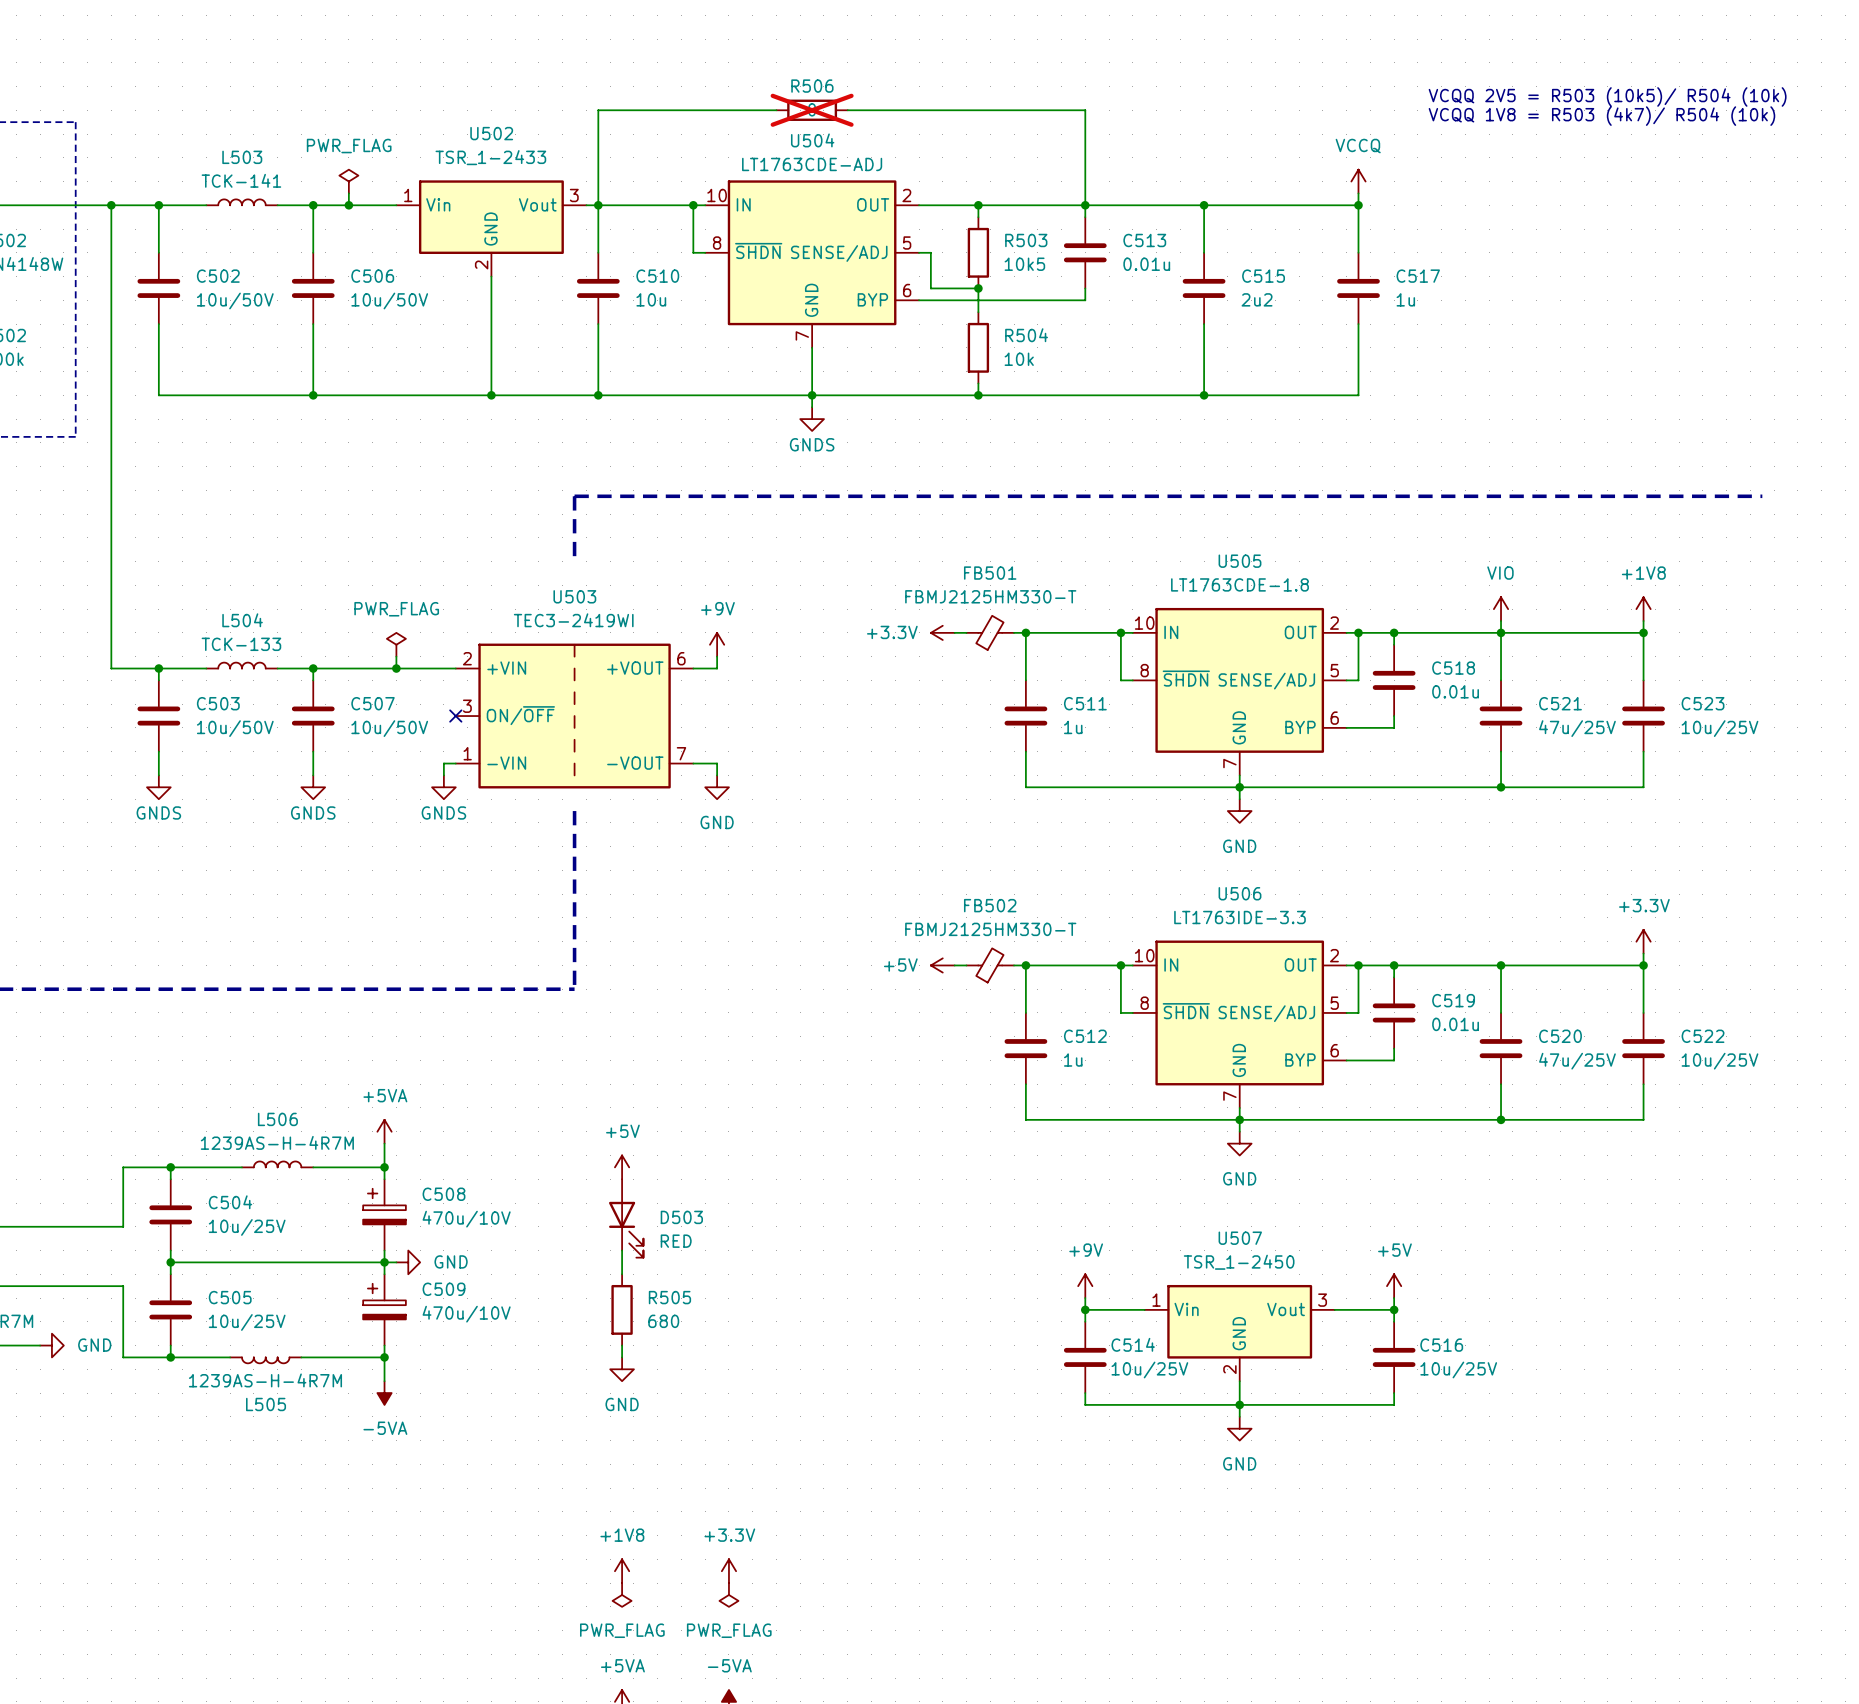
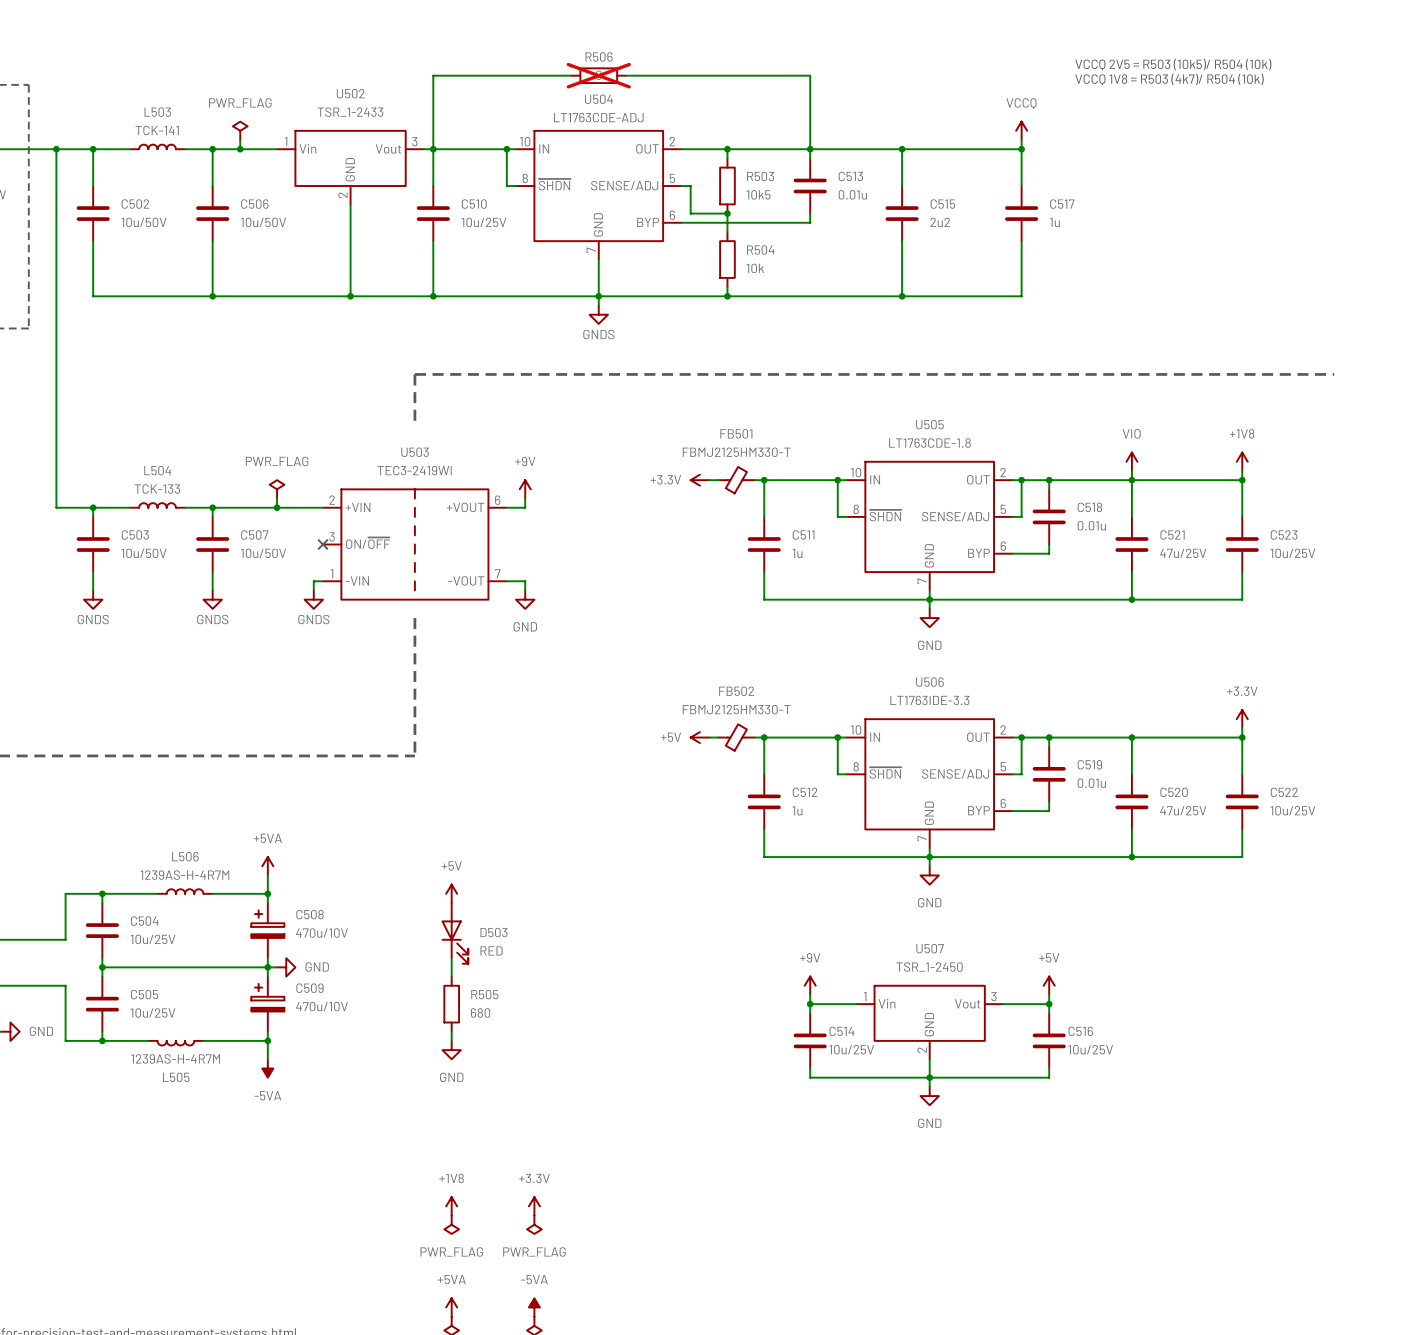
text: VCQQ 2V5 = R503 (10k5)/ R504 (10k) (1607, 96) -> VCCQ 2V5 = R503 (10k5)/ R504 (10k) (1173, 64)
text: VCQQ 1V8 = R503 (4k7)/ R504 (10k) (1601, 116) -> VCCQ 1V8 = R503 (4k7)/ R504 (10k) (1169, 79)
C510 value: 10u (651, 299) -> 10u/25V (483, 222)

